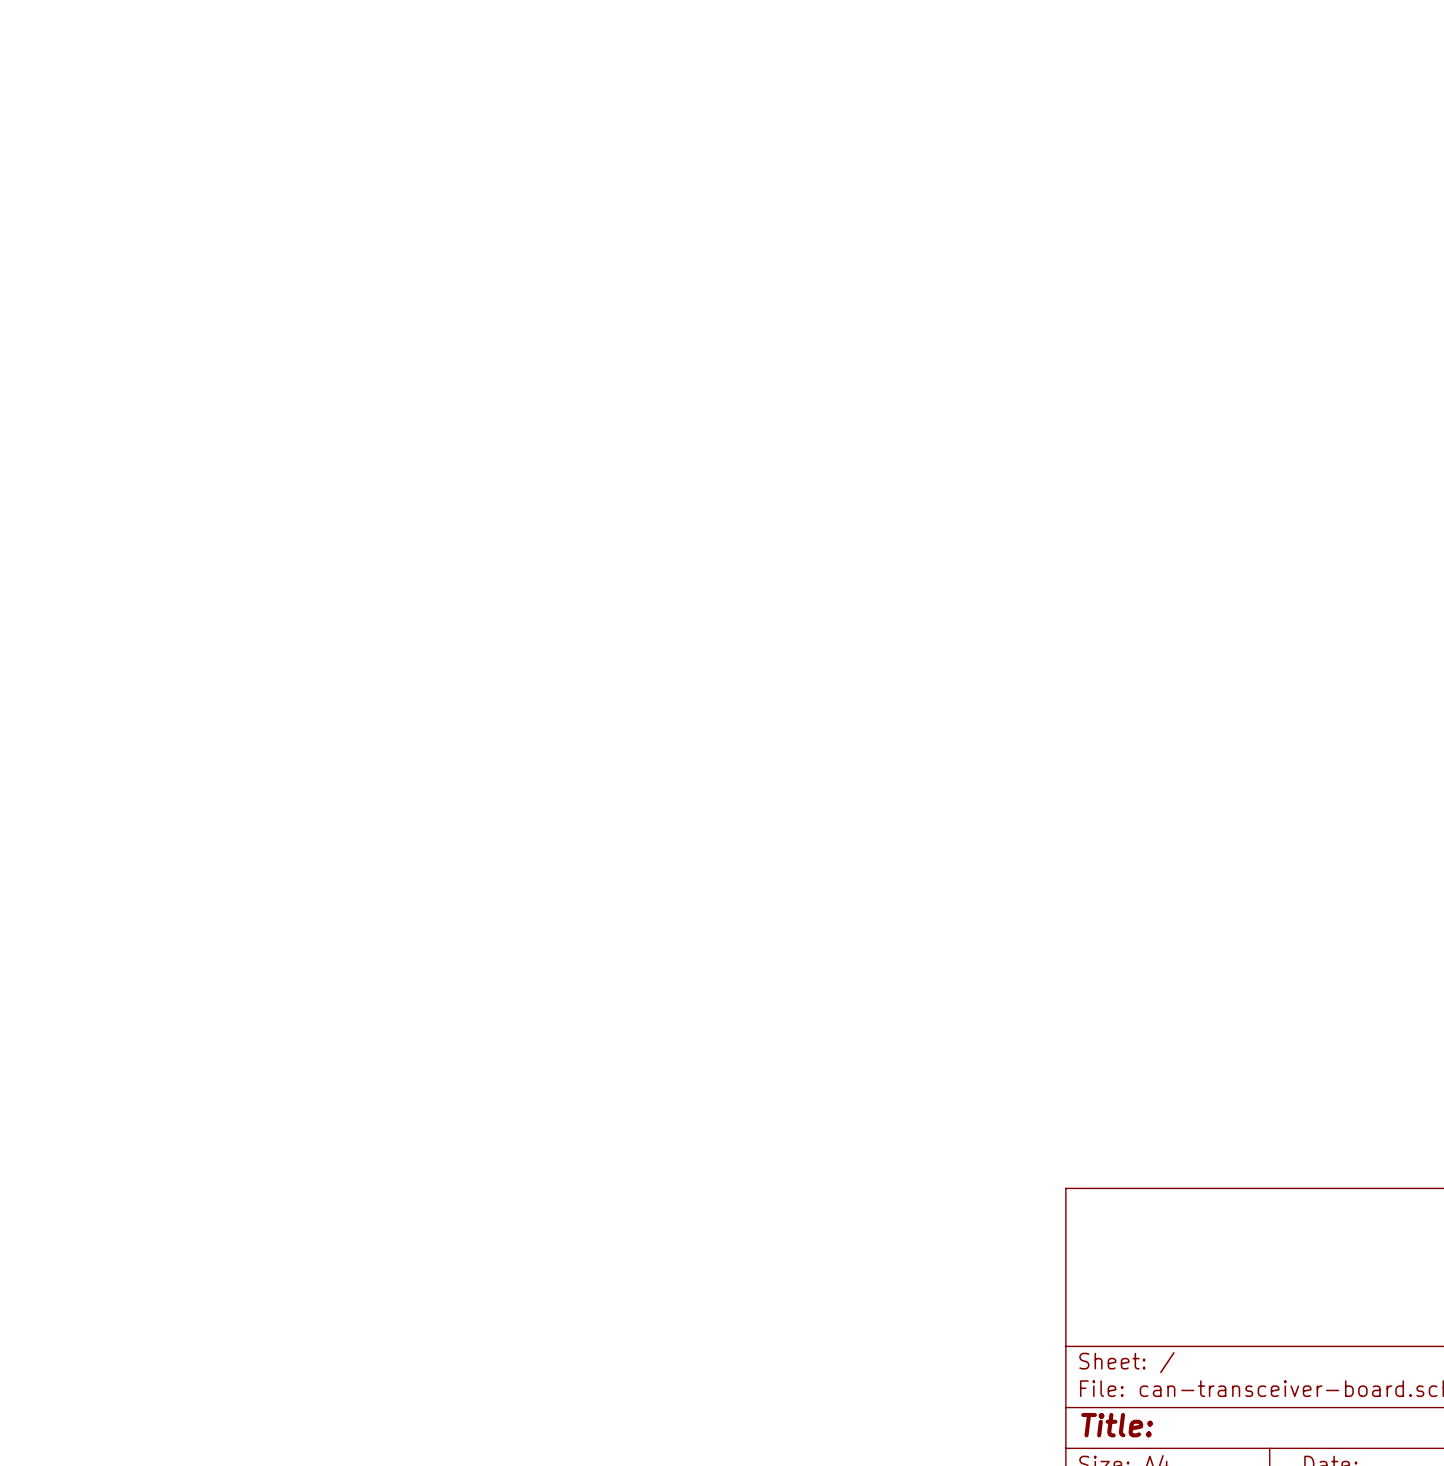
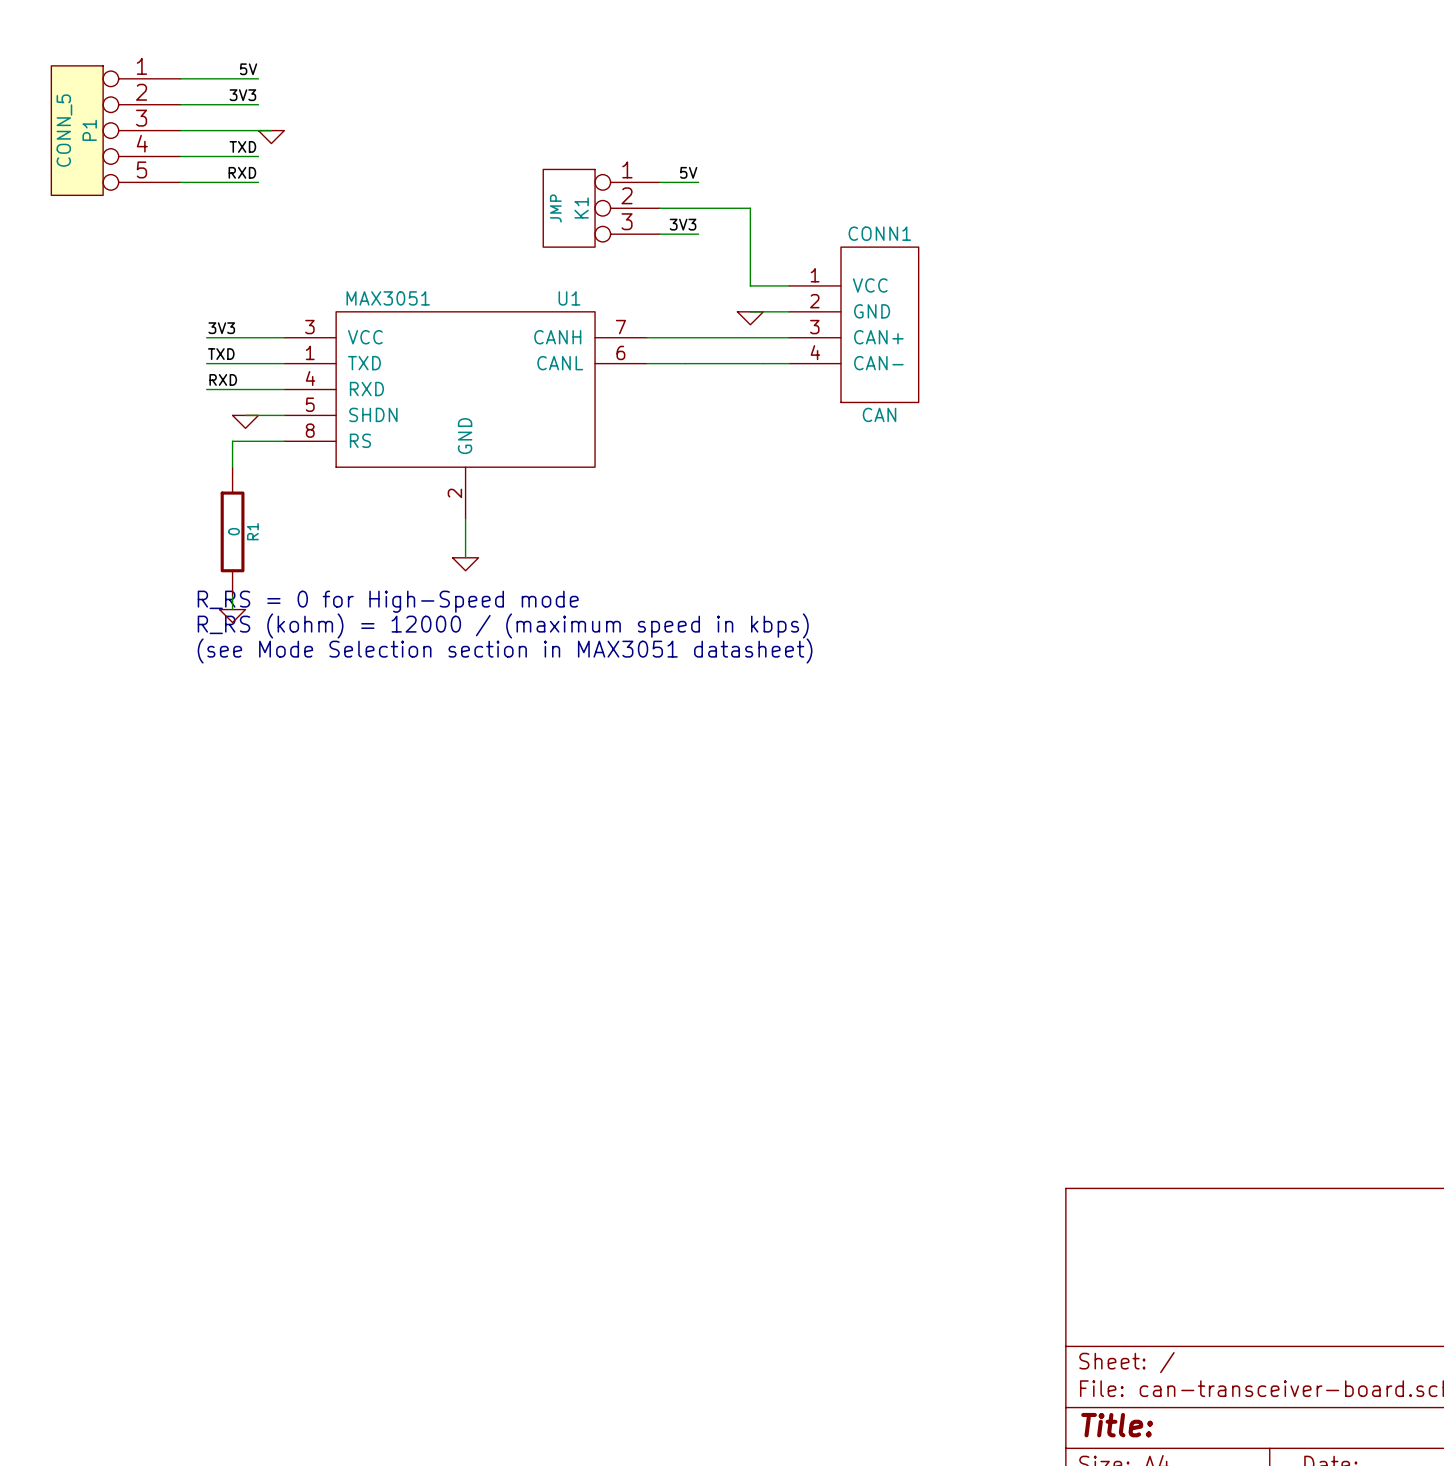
label: none -> 5V (248, 69)
wire: none -> (180, 78) (258, 78)
label: none -> 3V3 (242, 95)
wire: none -> (180, 104) (258, 104)
P1: none -> CONN_5 (116, 130)
wire: none -> (180, 130) (271, 130)
power symbol: none -> (271, 137)
label: none -> TXD (242, 146)
wire: none -> (180, 156) (258, 156)
label: none -> RXD (242, 172)
label: none -> 5V (688, 172)
wire: none -> (180, 182) (258, 182)
wire: none -> (659, 182) (698, 182)
K1: none -> JMP (601, 208)
wire: none -> (659, 208) (750, 208) (750, 285) (789, 285)
label: none -> 3V3 (683, 224)
wire: none -> (659, 234) (698, 234)
wire: none -> (750, 311) (789, 311)
power symbol: none -> (750, 318)
CONN1: none -> CAN (853, 324)
label: none -> 3V3 (221, 328)
wire: none -> (206, 337) (284, 337)
wire: none -> (646, 337) (789, 337)
label: none -> TXD (221, 354)
wire: none -> (206, 363) (284, 363)
wire: none -> (646, 363) (789, 363)
label: none -> RXD (223, 379)
wire: none -> (206, 389) (284, 389)
wire: none -> (245, 415) (284, 415)
U1: none -> MAX3051 (465, 415)
power symbol: none -> (245, 421)
wire: none -> (284, 441) (232, 441) (232, 467)
wire: none -> (465, 518) (465, 557)
R1: none -> 0 (232, 531)
power symbol: none -> (465, 564)
wire: none -> (232, 596) (232, 609)
text: none -> R_RS = 0 for High-Speed mode (388, 601)
power symbol: none -> (232, 616)
text: none -> R_RS (kohm) = 12000 / (maximum speed in kbps) (503, 625)
text: none -> (see Mode Selection section in MAX3051 datasheet) (505, 650)

